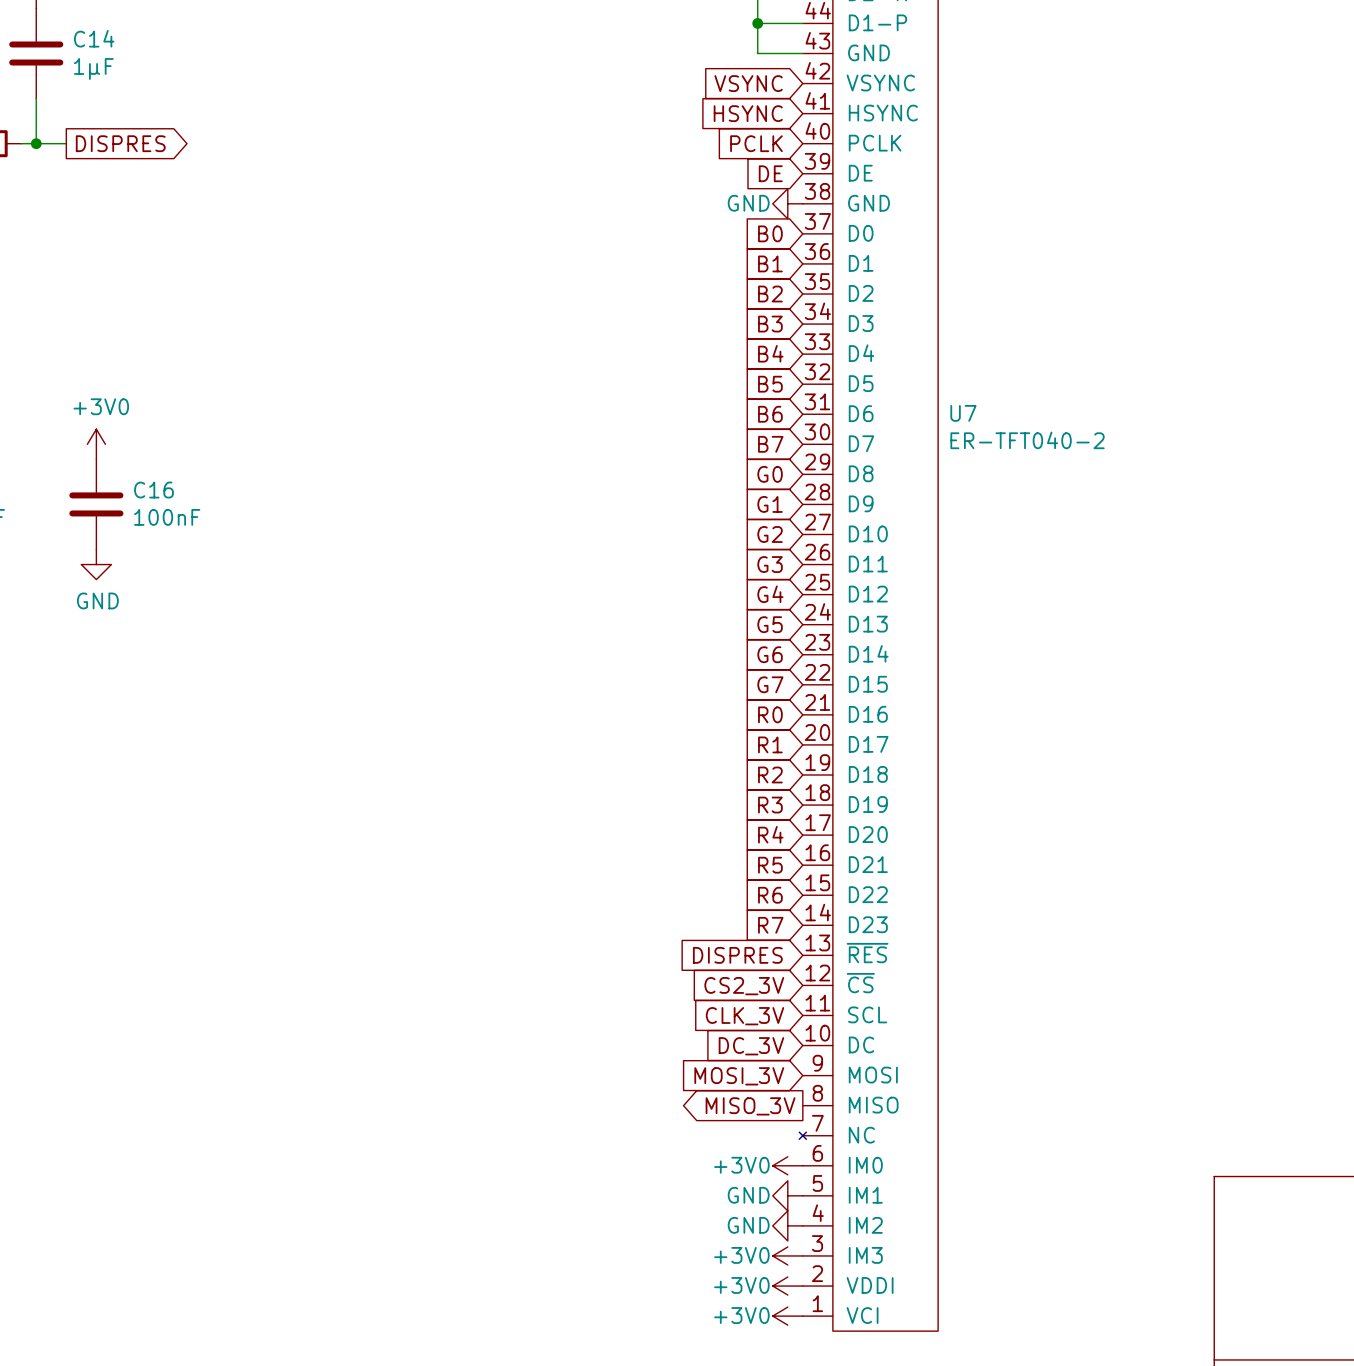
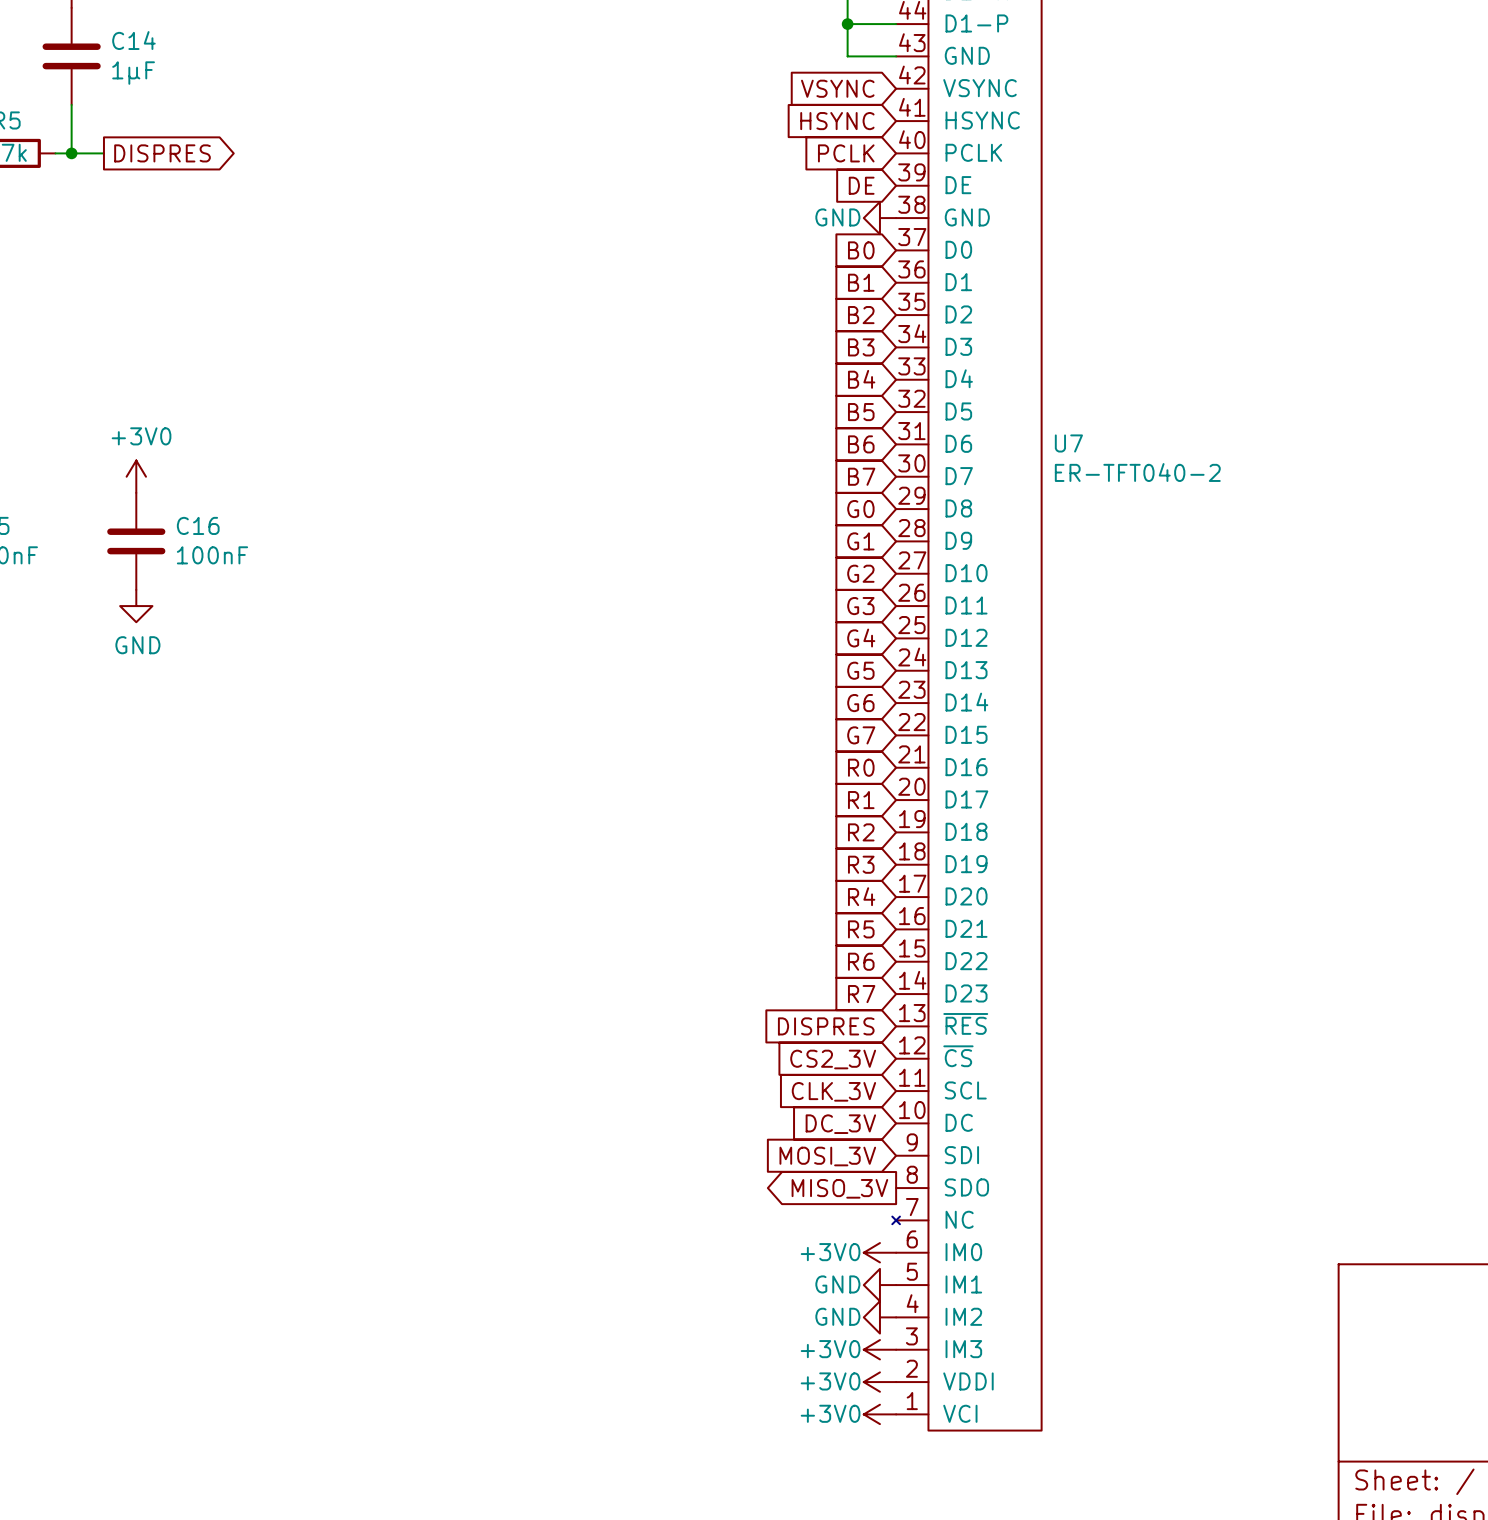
U7 pin name: MOSI (873, 1075) -> SDI (961, 1155)
U7 pin name: MISO (873, 1105) -> SDO (966, 1187)

